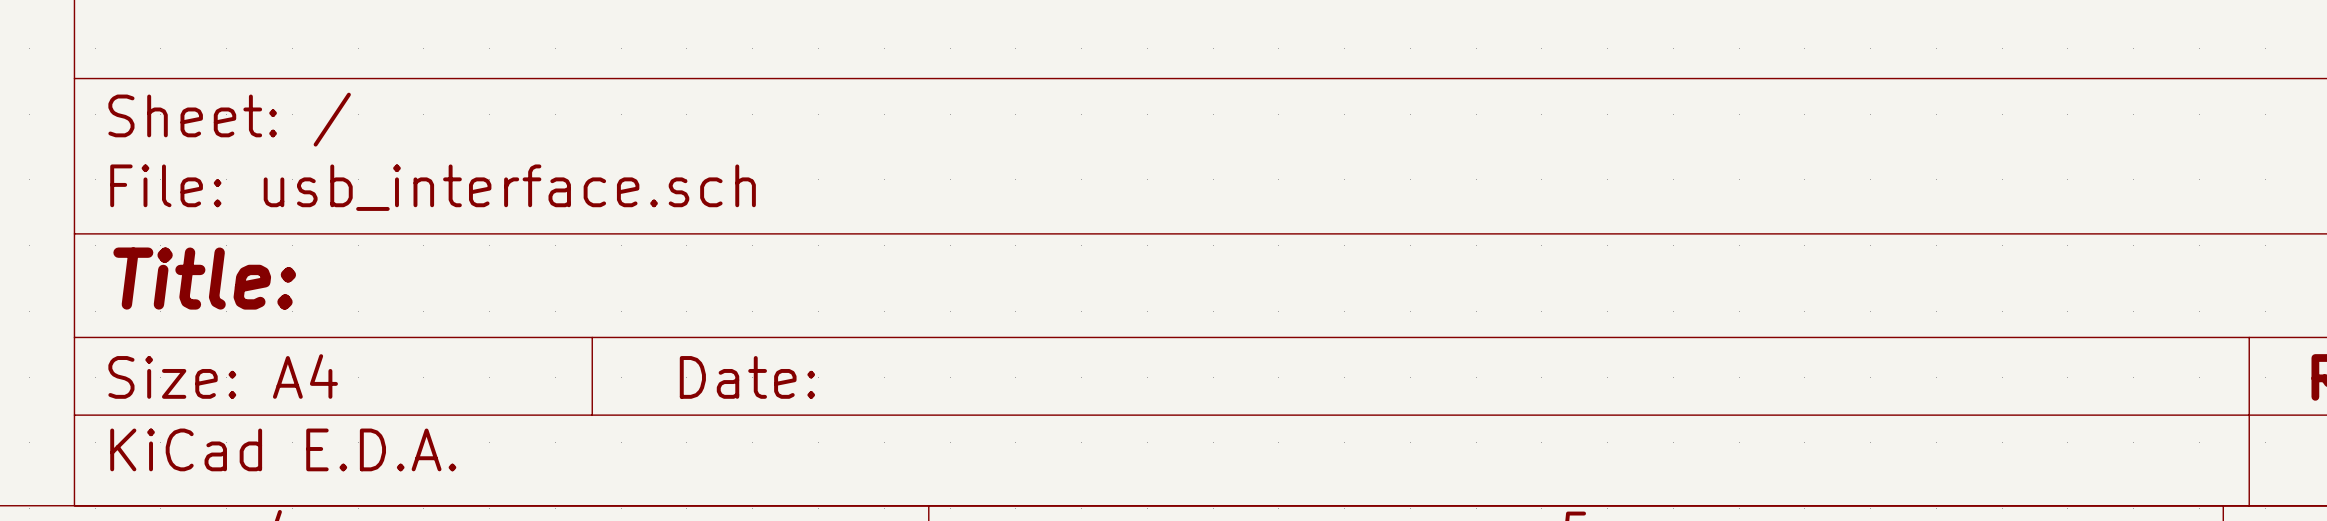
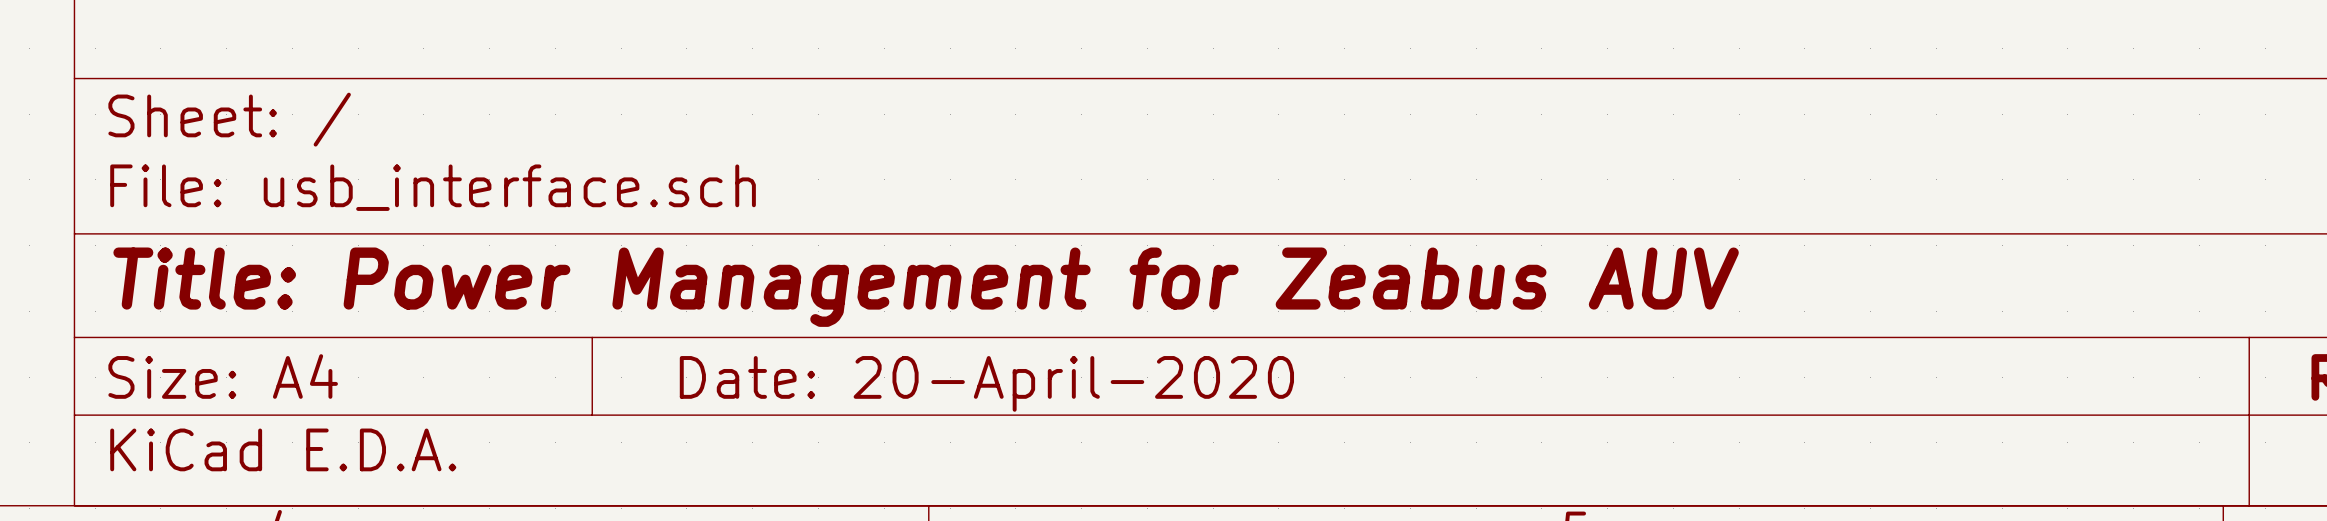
title block: Title: (204, 278) -> Title: Power Management for Zeabus AUV (926, 287)
title block: Date: (747, 377) -> Date: 20-April-2020 (986, 383)

